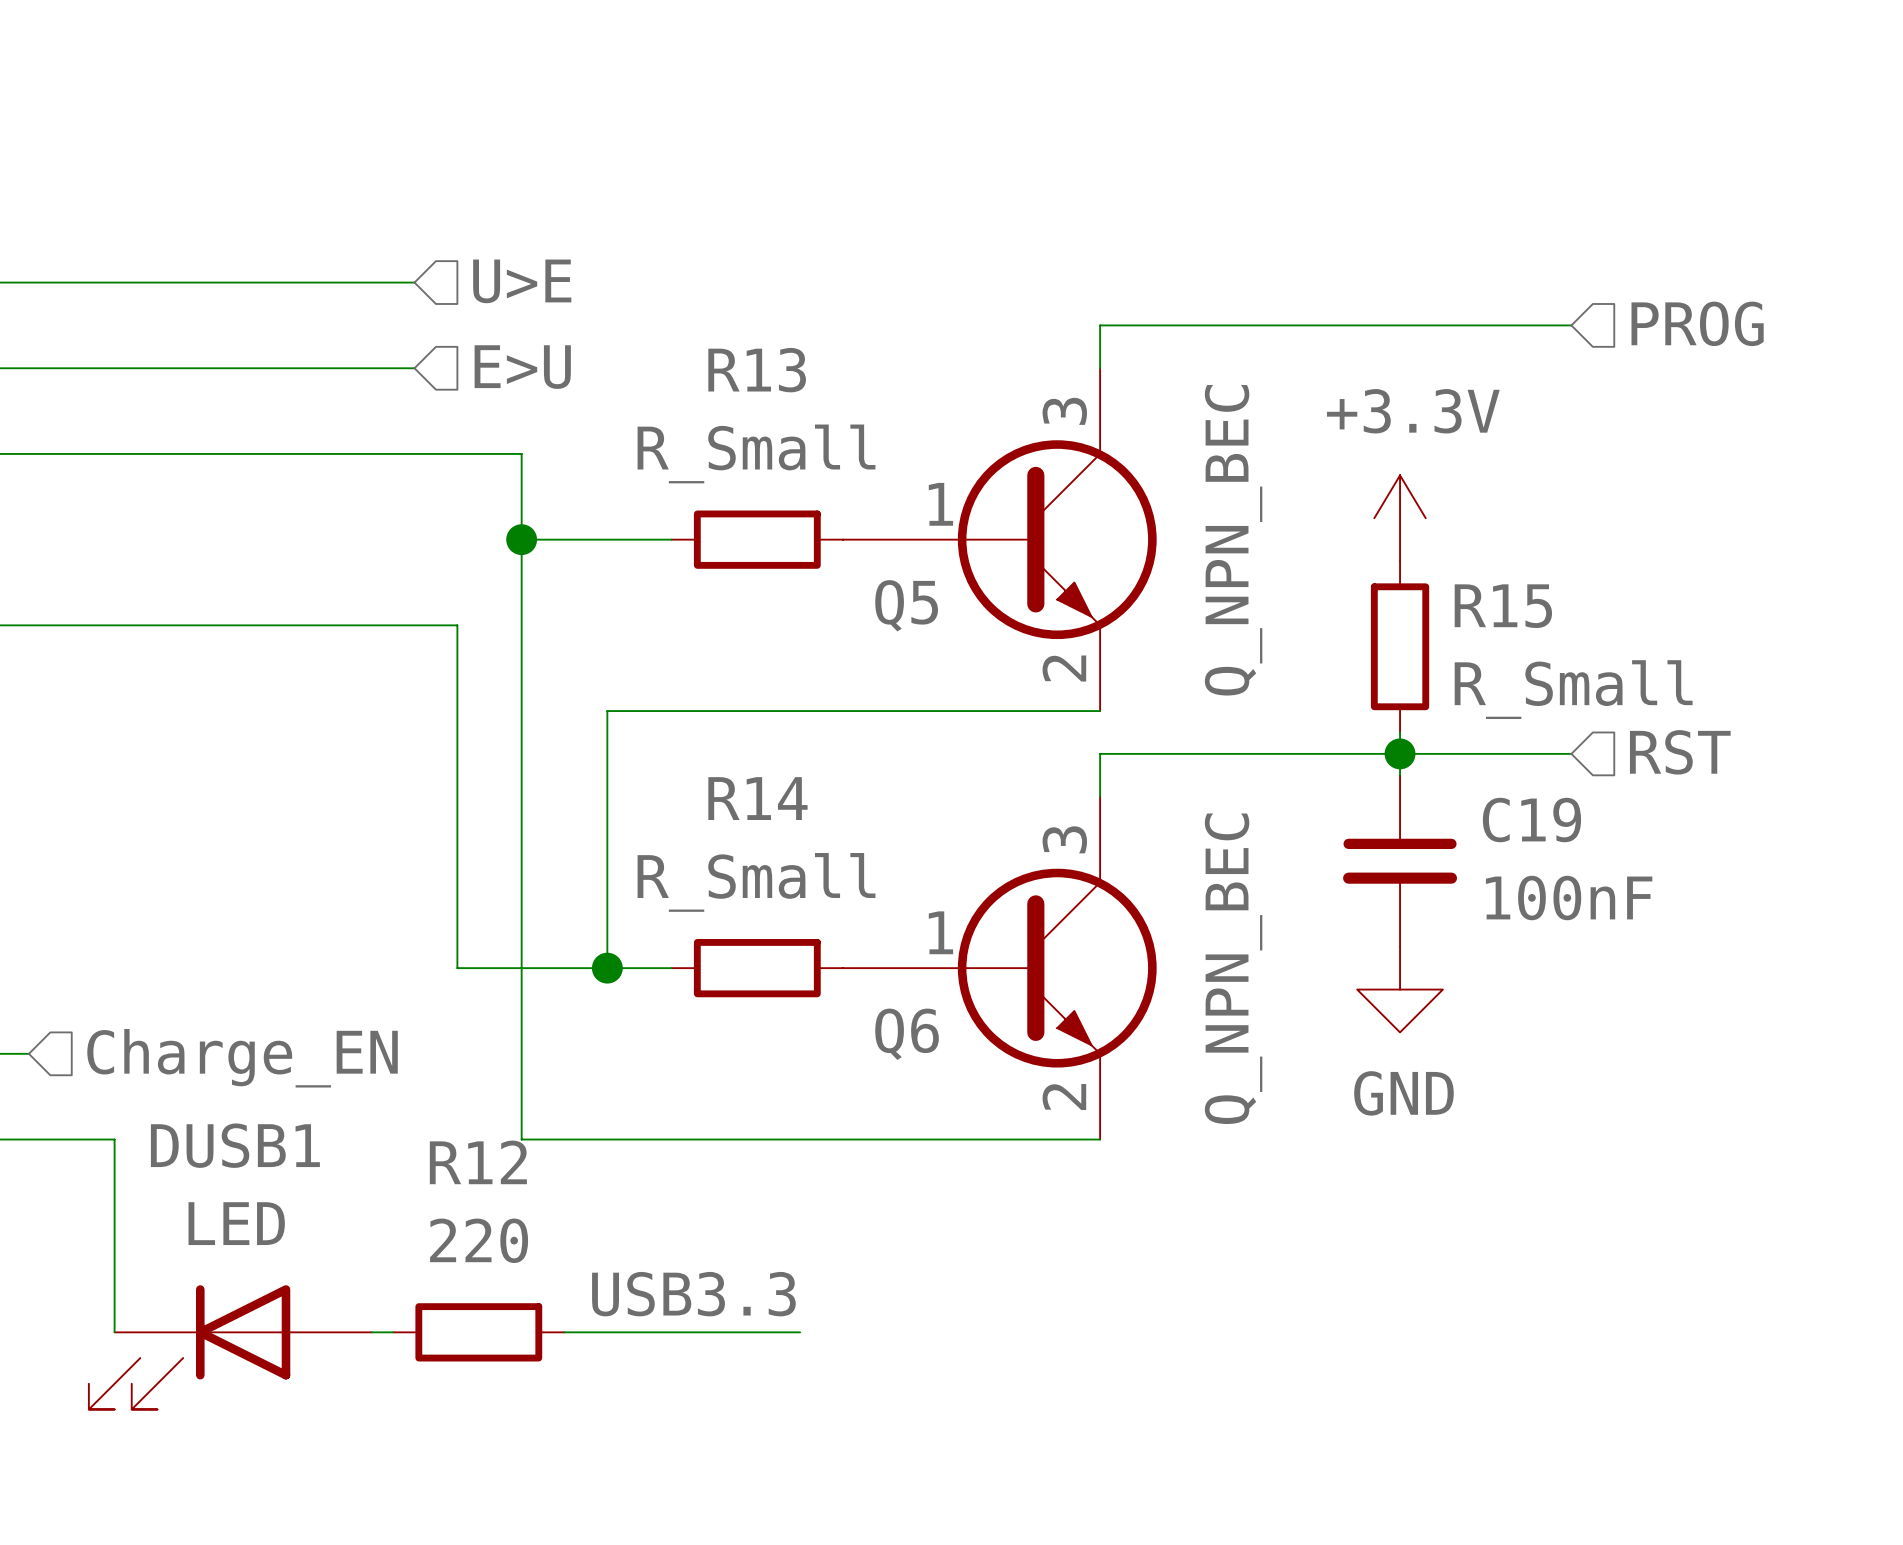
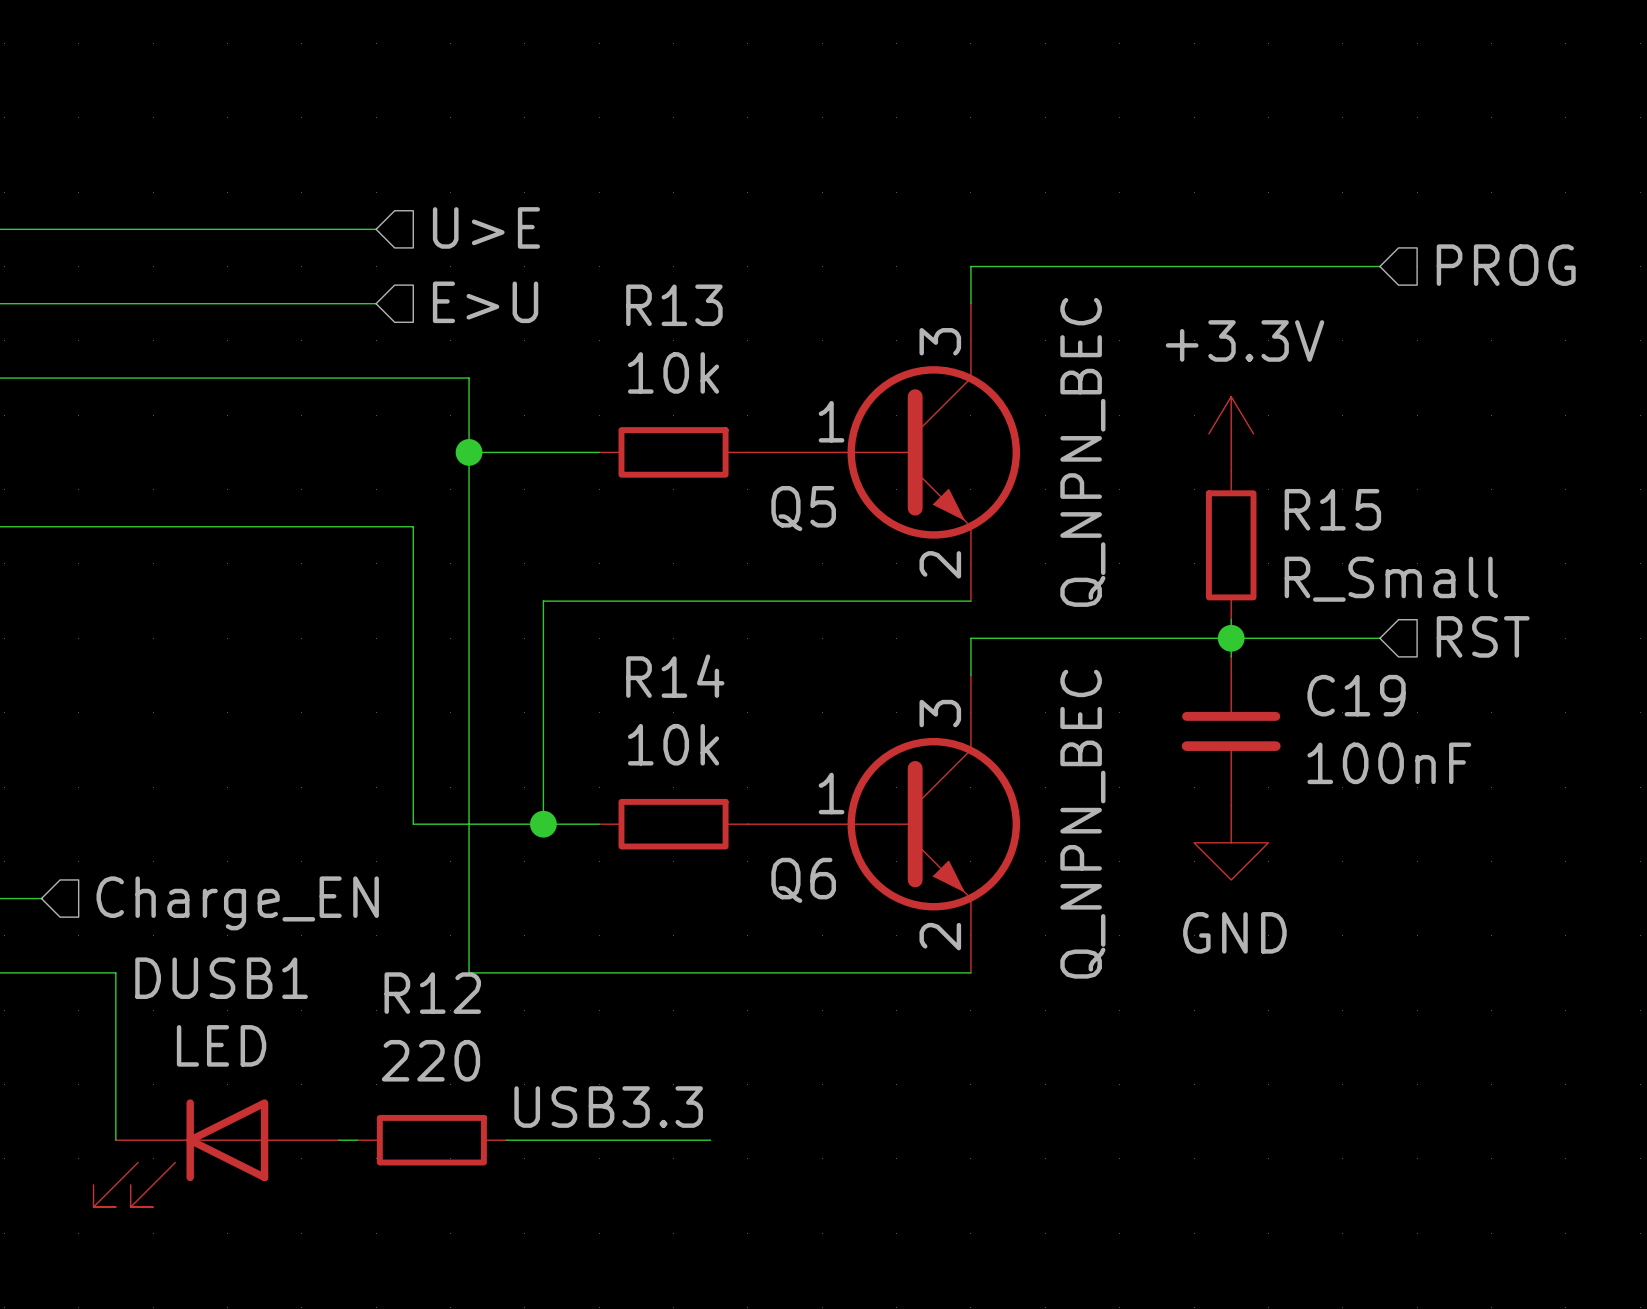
R13 value: R_Small (756, 453) -> 10k (673, 372)
R14 value: R_Small (756, 882) -> 10k (673, 744)

